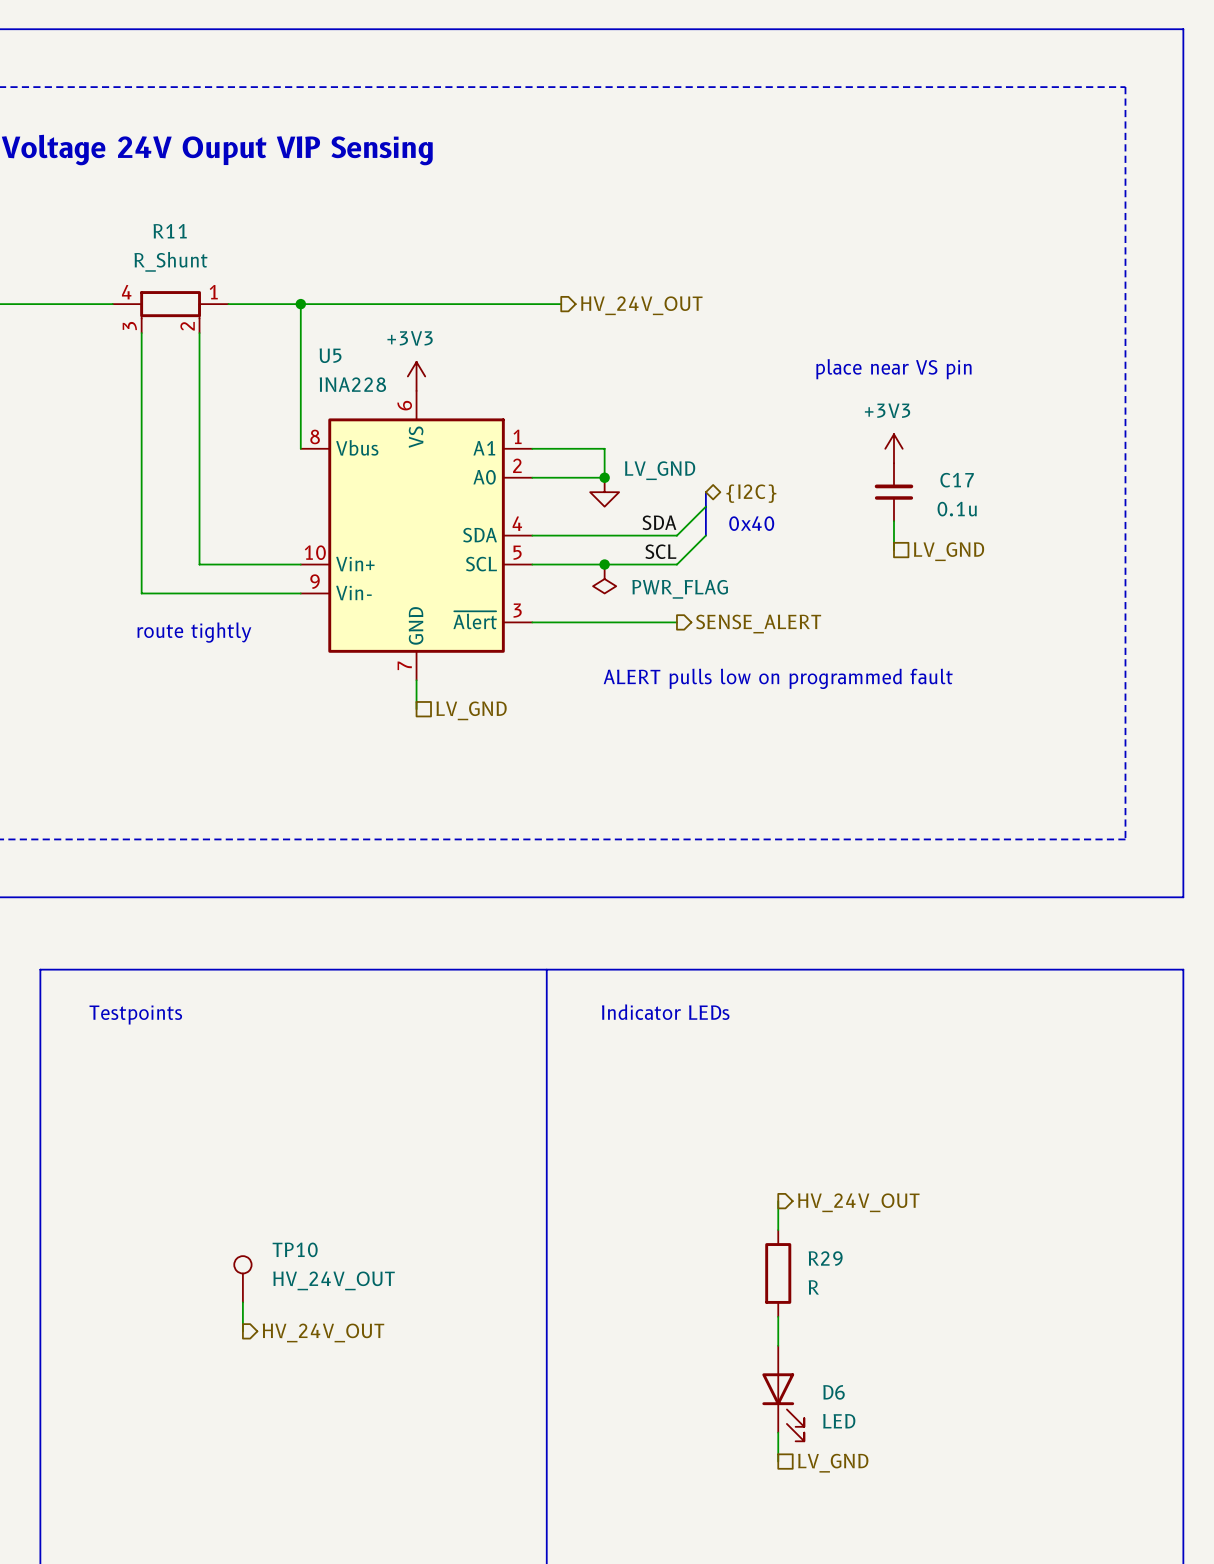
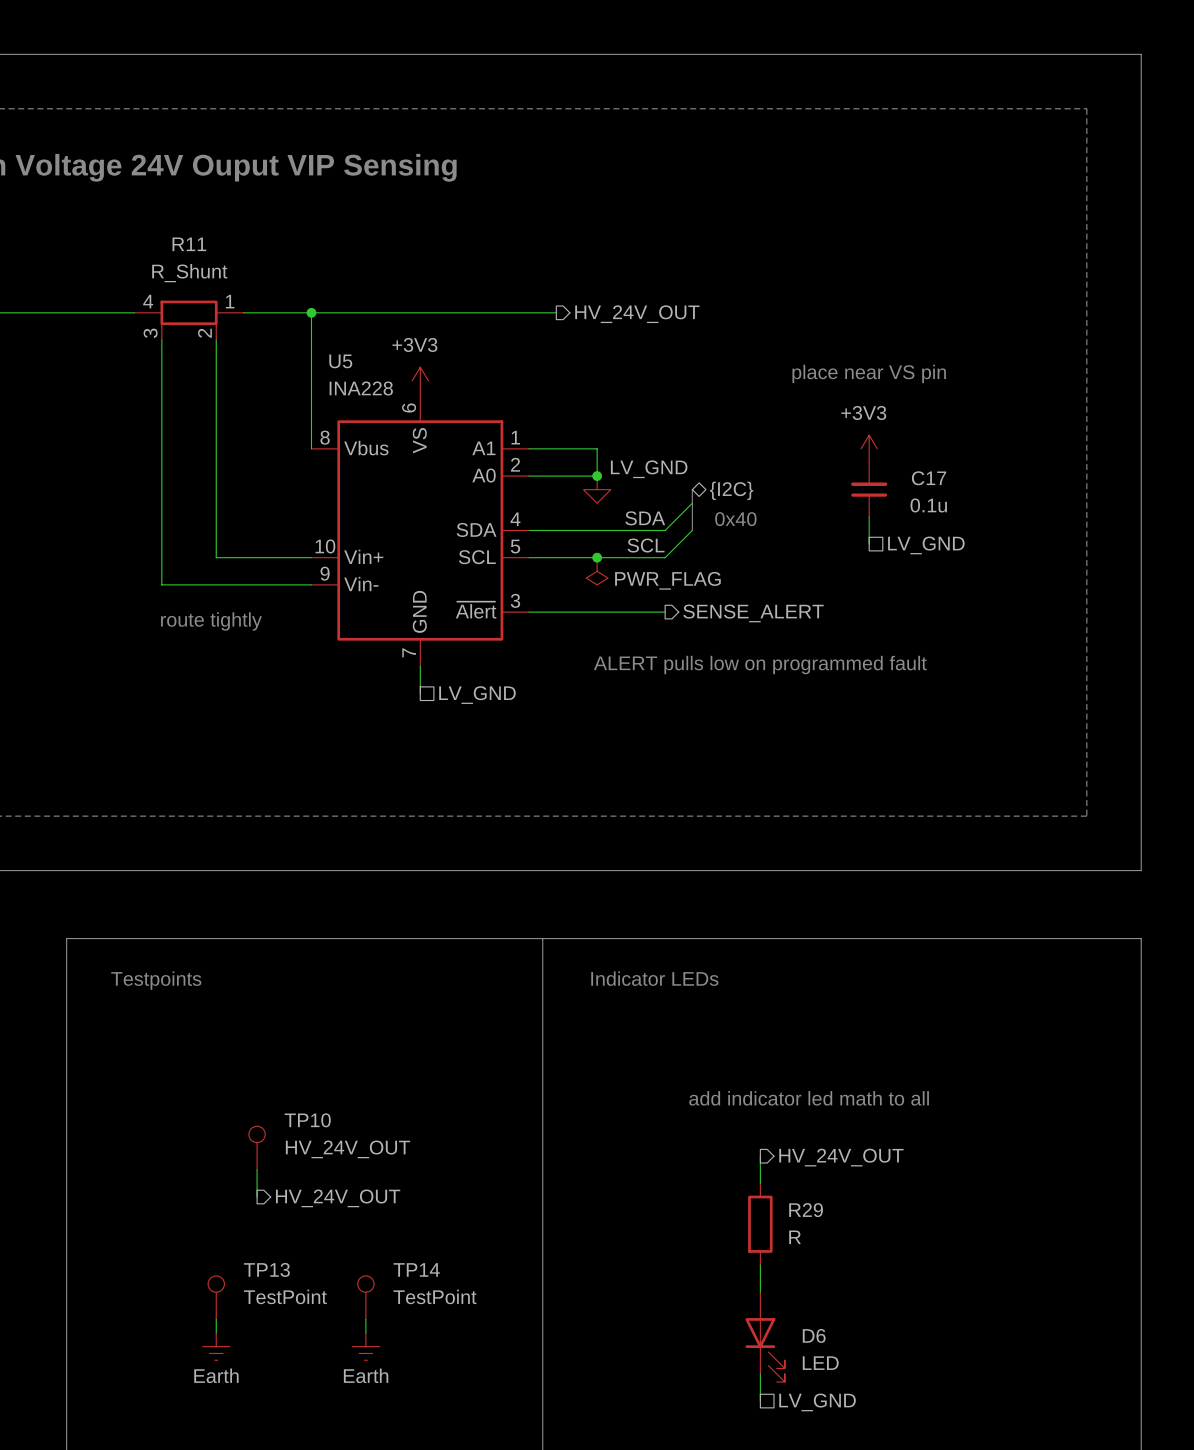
text: none -> add indicator led math to all (809, 1098)
TP10 position: (242, 1279) -> (257, 1148)
wire: (242, 1302) (242, 1331) -> (257, 1169) (257, 1197)
hierarchical label position: HV_24V_OUT (323, 1332) -> HV_24V_OUT (338, 1198)
TP13: none -> TestPoint (216, 1297)
TP14: none -> TestPoint (365, 1297)
wire: none -> (216, 1319) (216, 1333)
wire: none -> (365, 1319) (365, 1333)
power symbol: none -> Earth (216, 1346)
power symbol: none -> Earth (365, 1346)

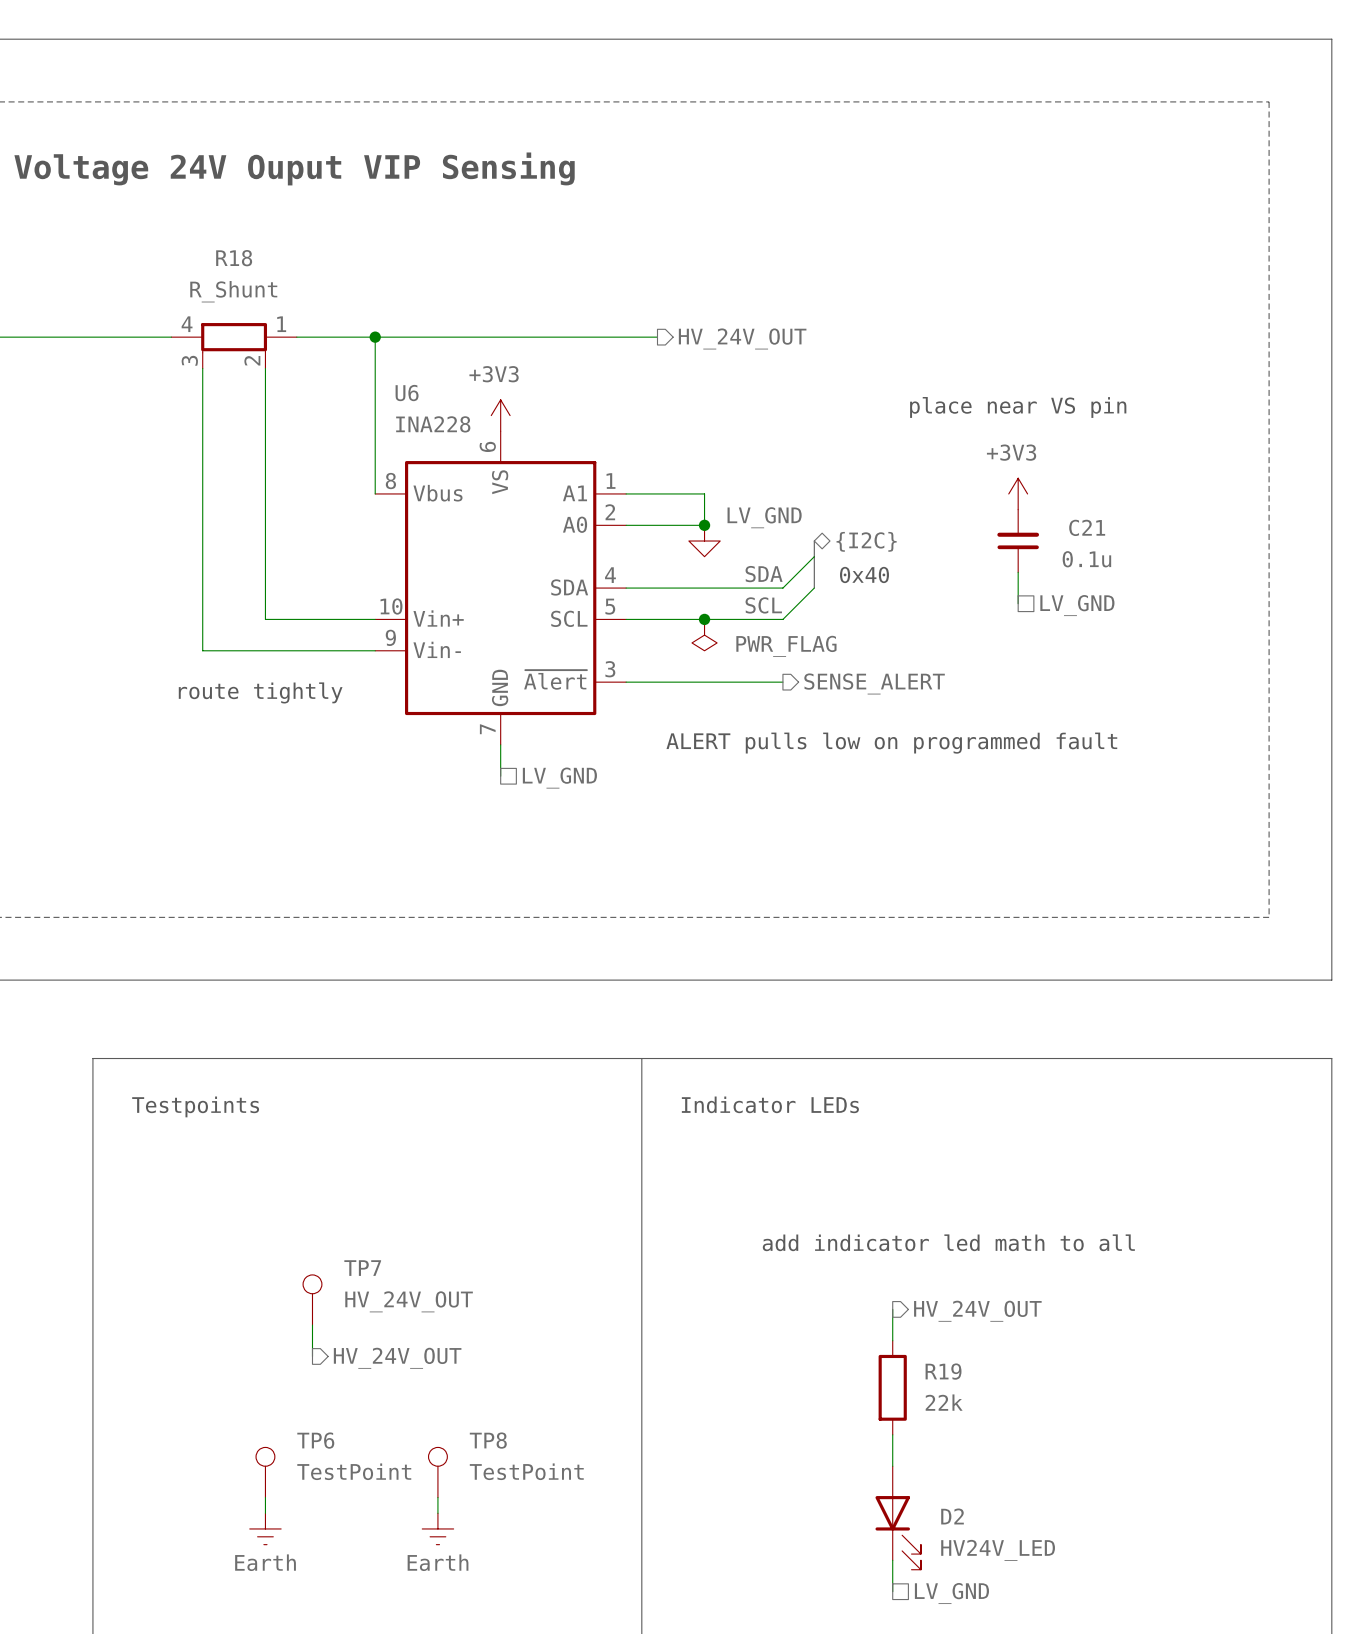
R11 name: R11 (189, 244) -> R18 (234, 258)
U5 name: U5 (340, 361) -> U6 (407, 393)
C17 name: C17 (929, 478) -> C21 (1087, 527)
TP10 name: TP10 (307, 1120) -> TP7 (362, 1268)
R29 name: R29 (806, 1210) -> R19 (943, 1371)
R29 value: R (795, 1237) -> 22k (944, 1402)
TP13 name: TP13 (266, 1269) -> TP6 (315, 1440)
TP14 name: TP14 (416, 1269) -> TP8 (488, 1440)
D6 name: D6 (814, 1335) -> D2 (952, 1516)
D6 value: LED (820, 1363) -> HV24V_LED (998, 1550)

